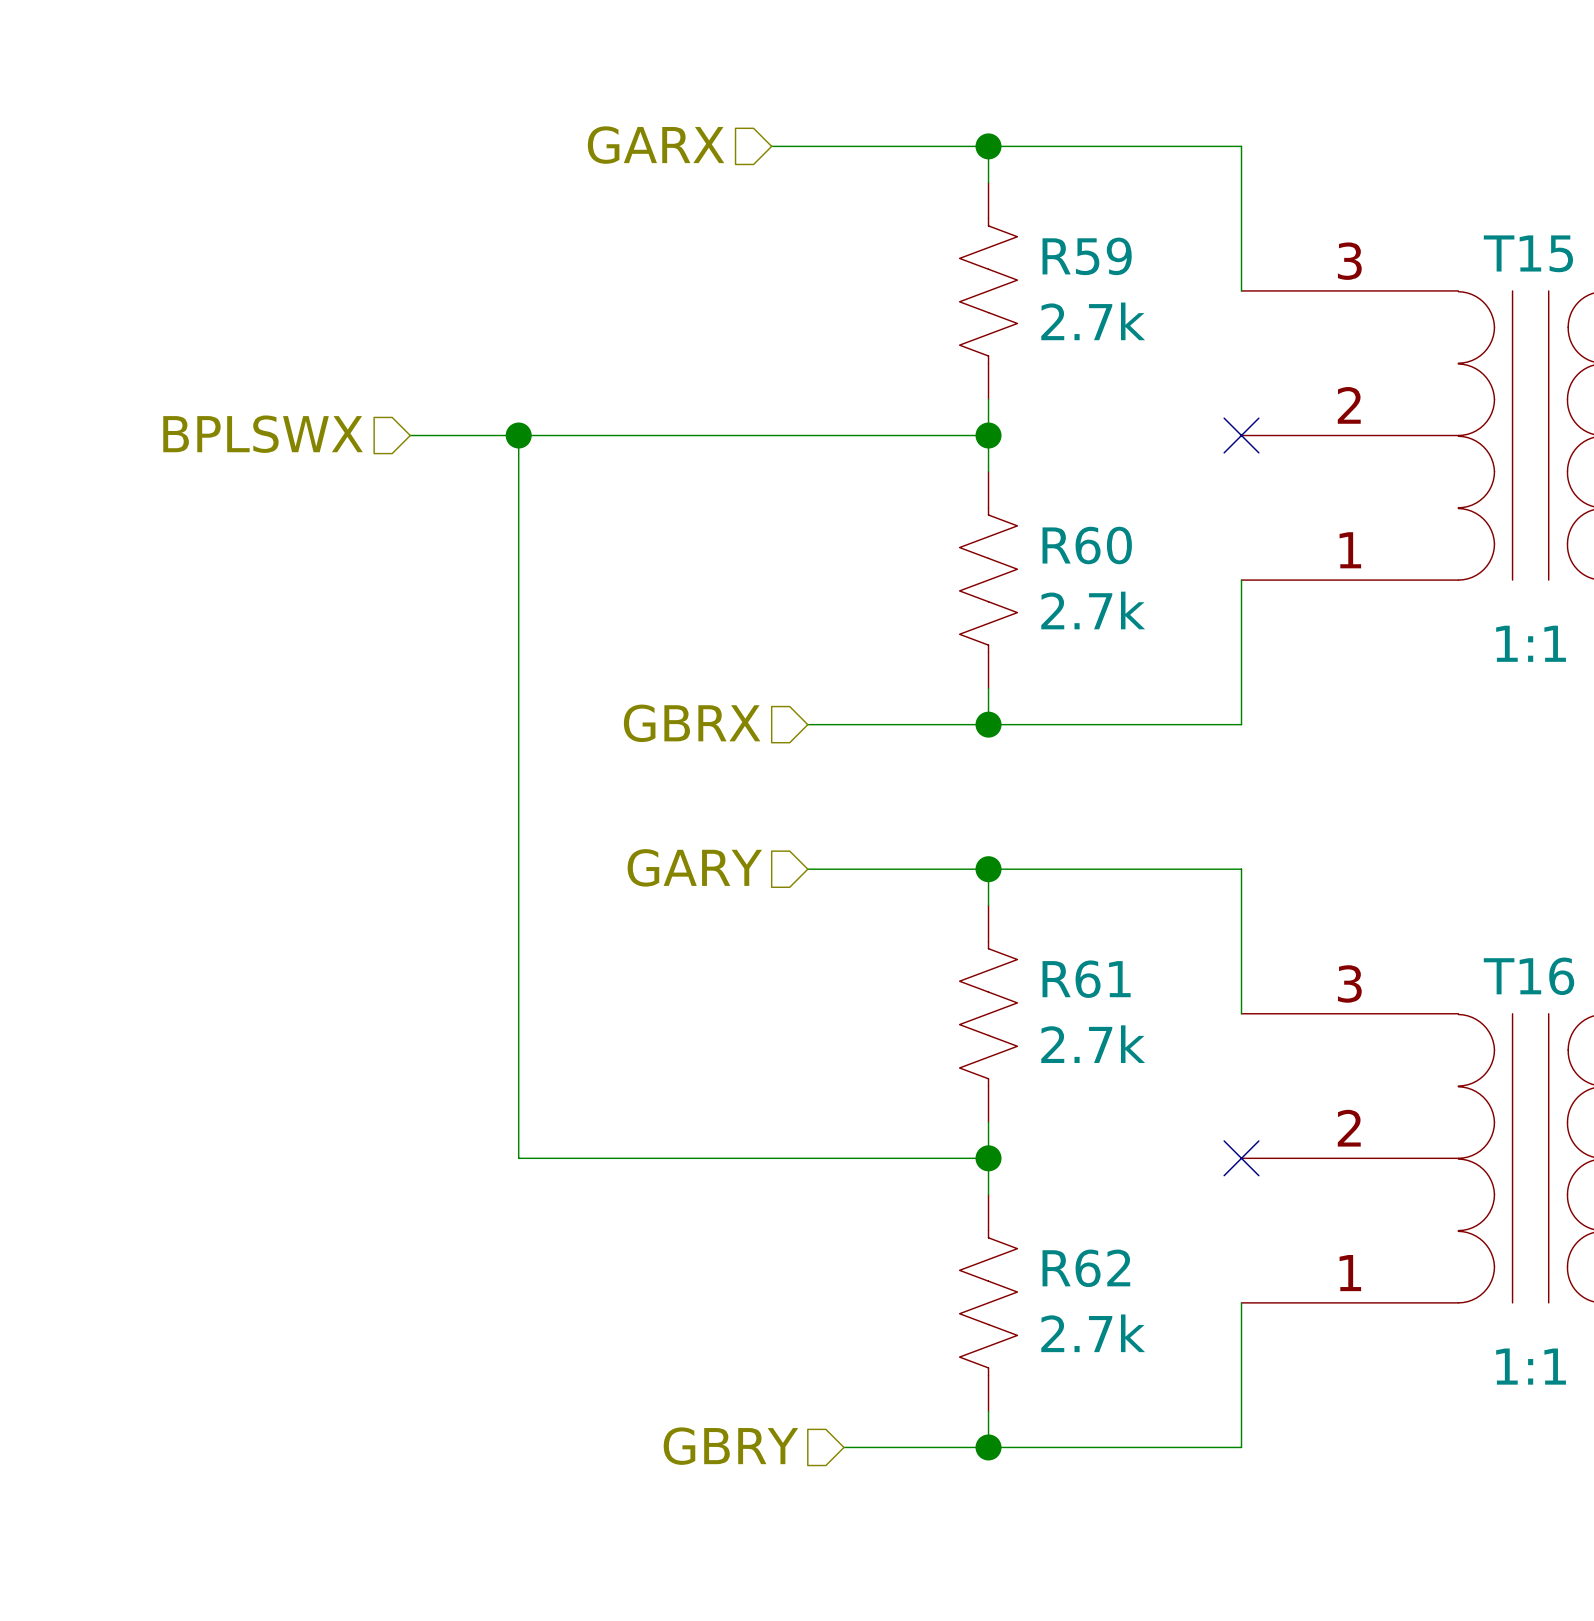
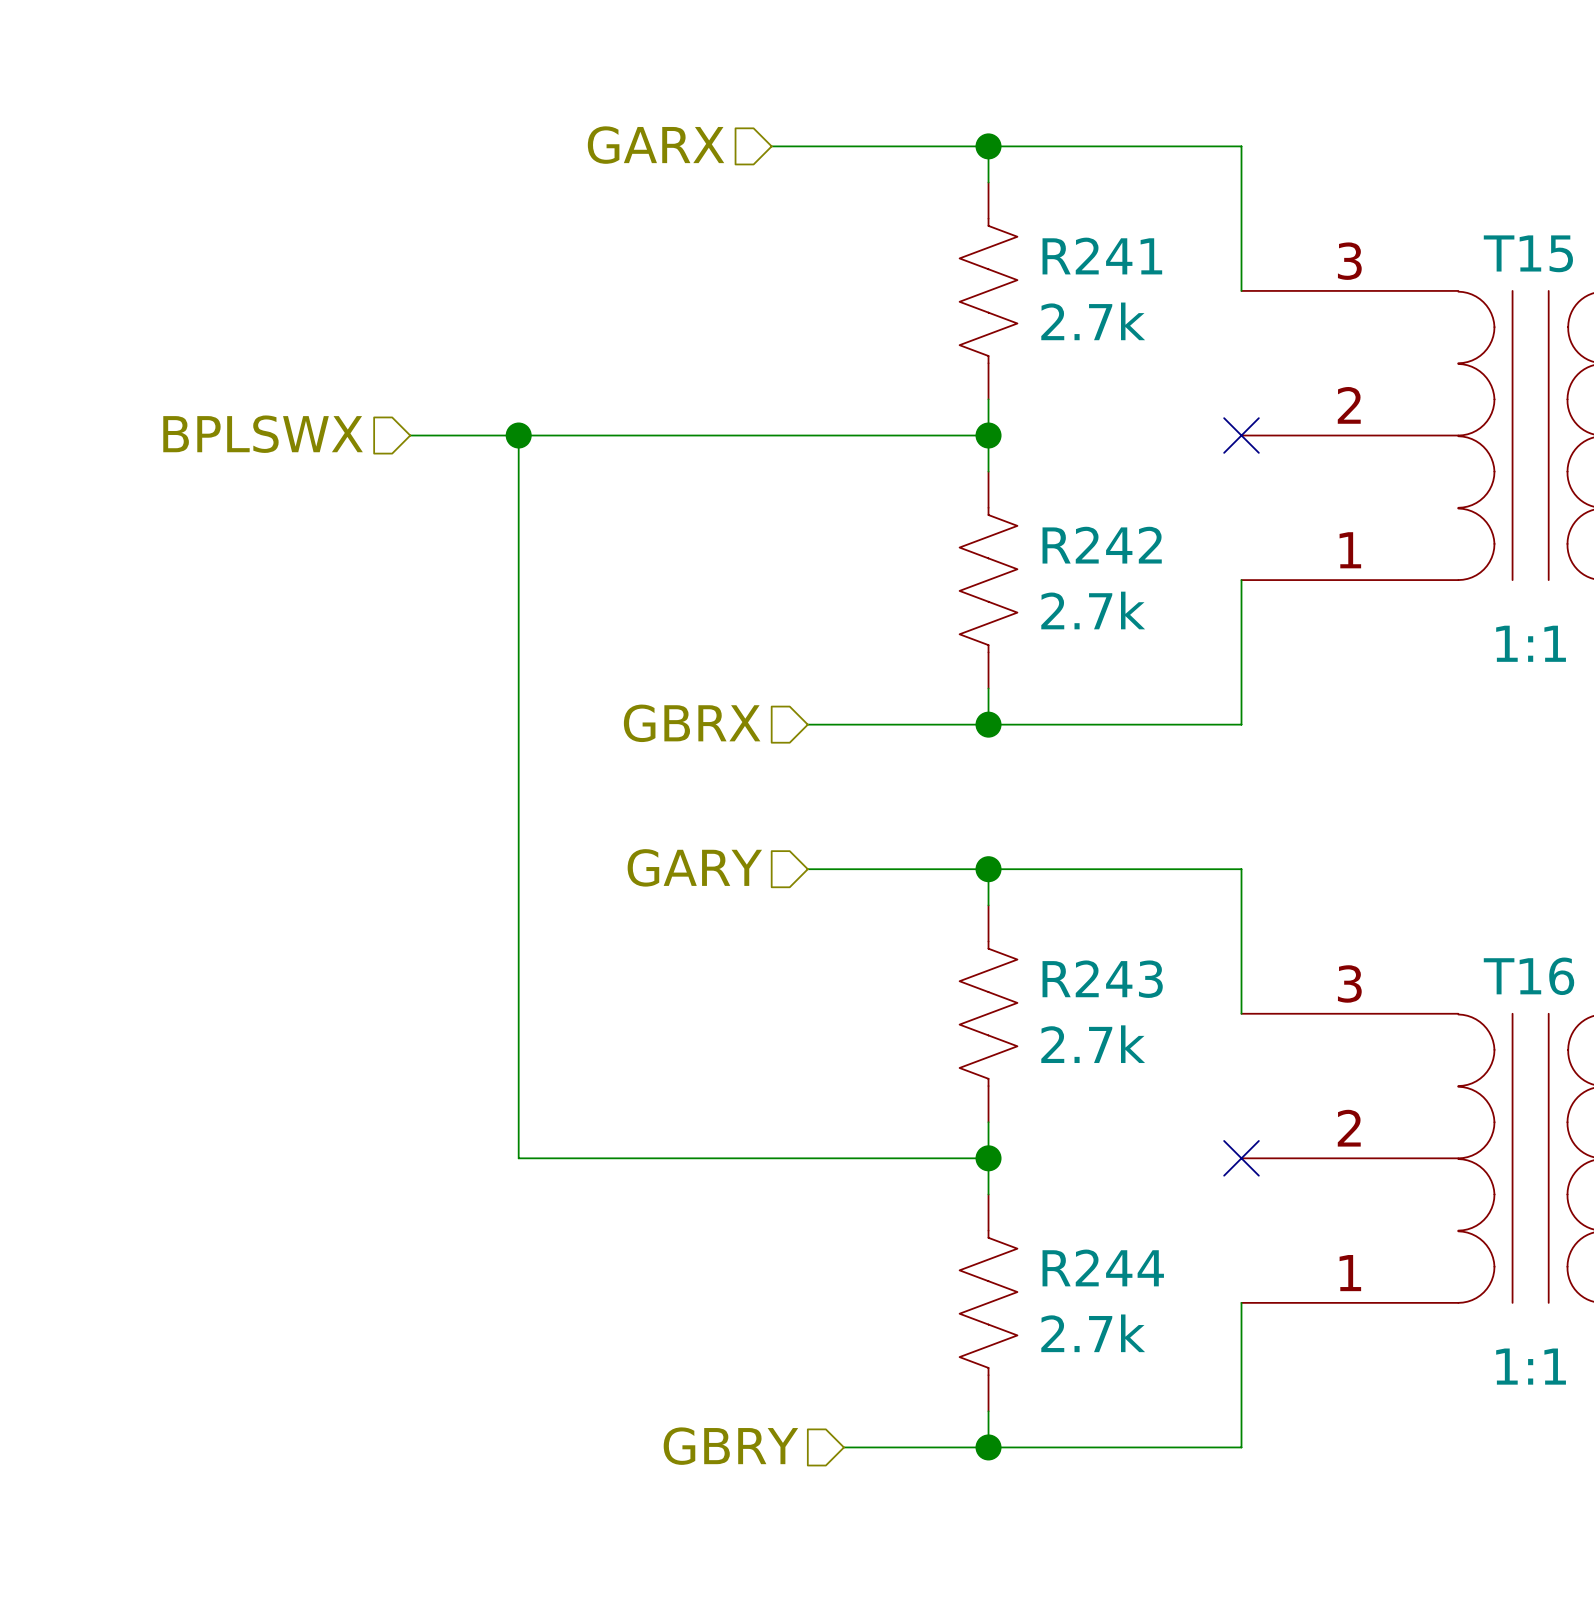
R59 name: R59 (1087, 256) -> R241 (1102, 256)
R60 name: R60 (1087, 545) -> R242 (1102, 545)
R61 name: R61 (1086, 979) -> R243 (1102, 979)
R62 name: R62 (1086, 1268) -> R244 (1103, 1267)

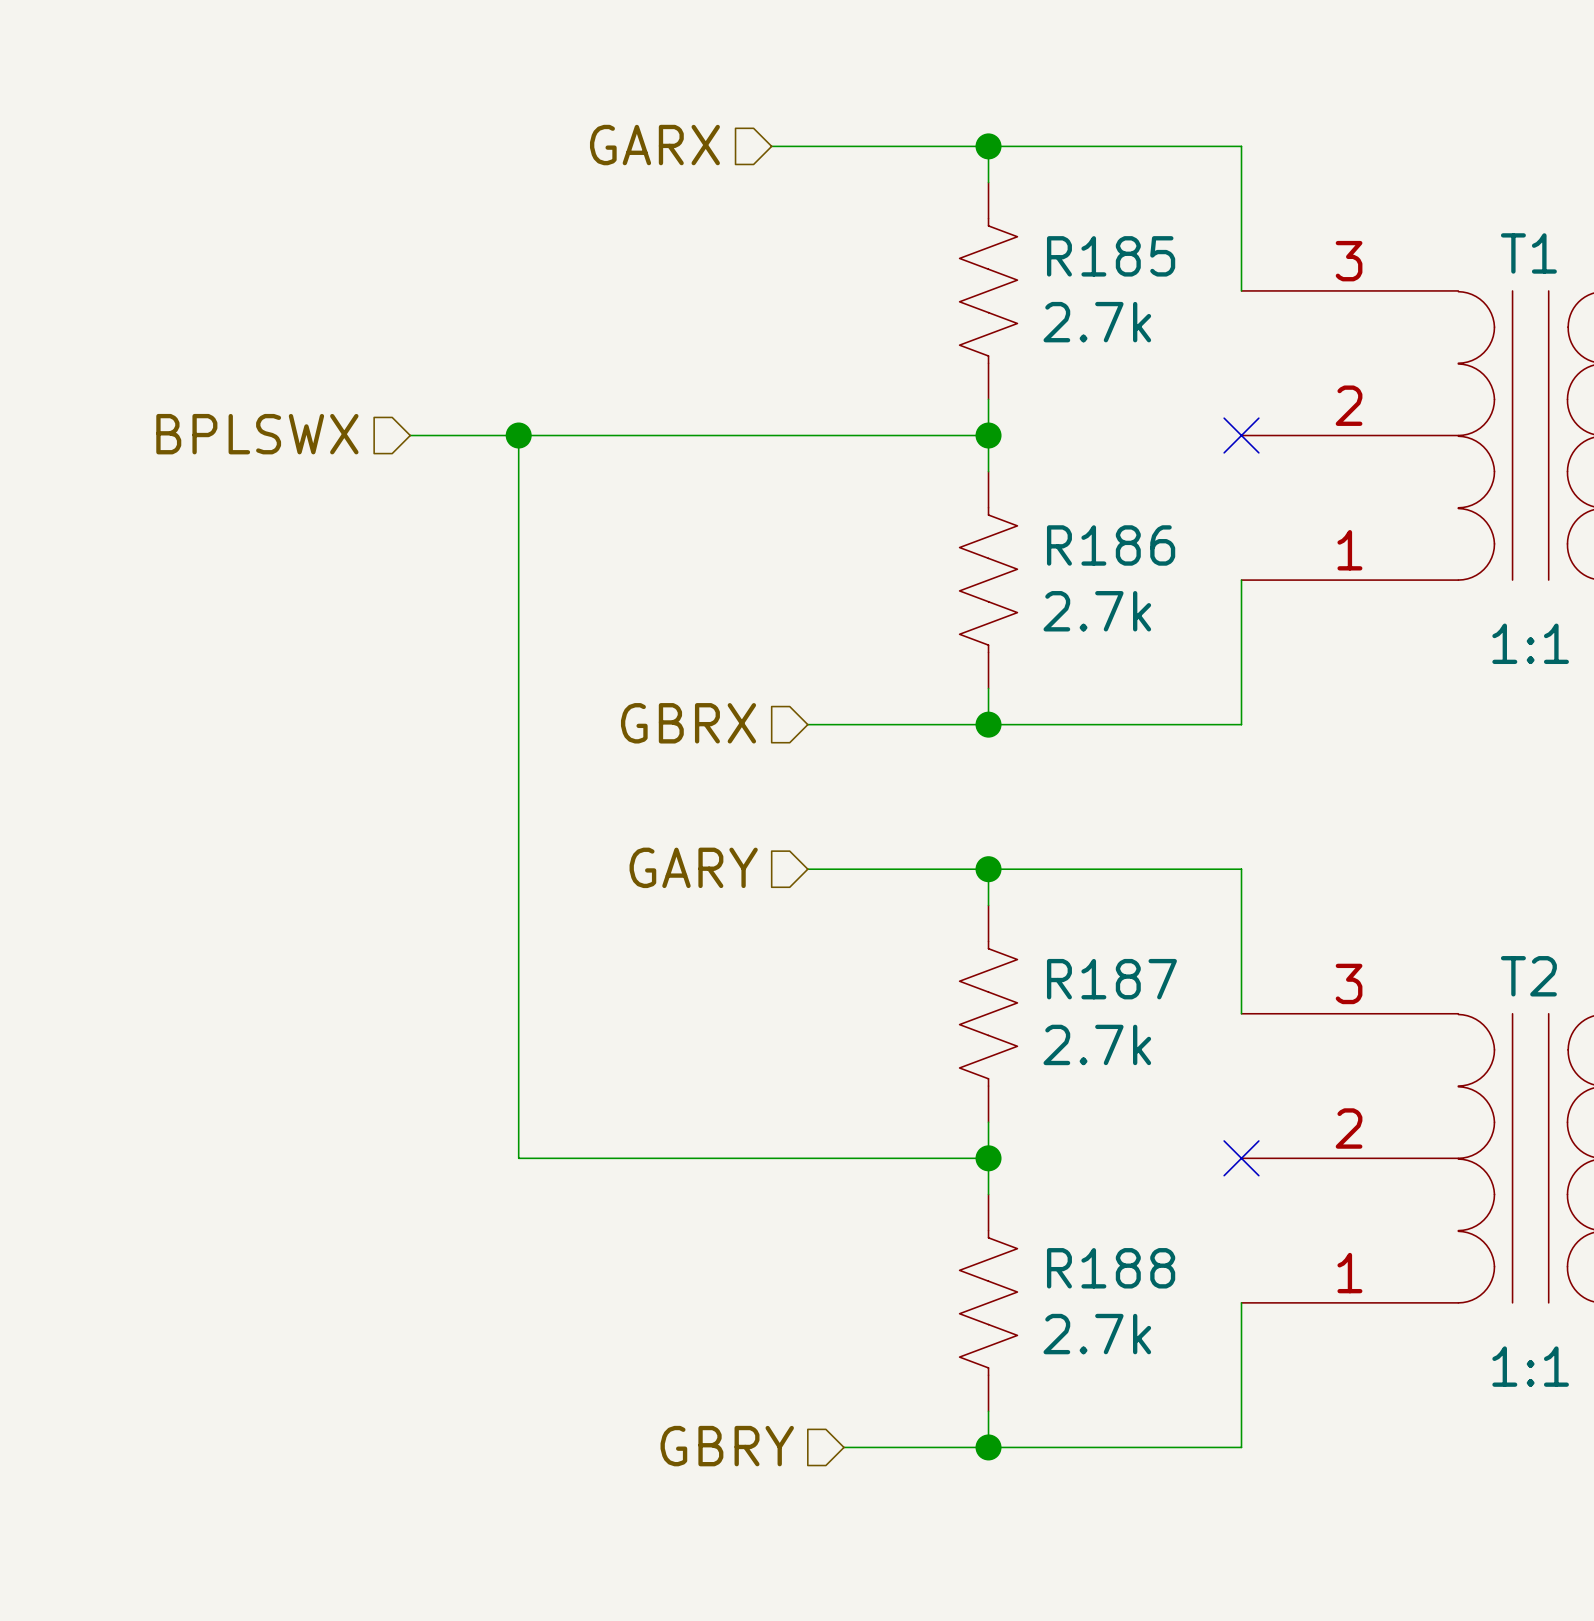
T15 name: T15 (1528, 253) -> T1 (1528, 253)
R241 name: R241 (1102, 256) -> R185 (1111, 256)
R242 name: R242 (1102, 545) -> R186 (1111, 545)
T16 name: T16 (1528, 976) -> T2 (1528, 976)
R243 name: R243 (1102, 979) -> R187 (1111, 979)
R244 name: R244 (1103, 1267) -> R188 (1111, 1268)

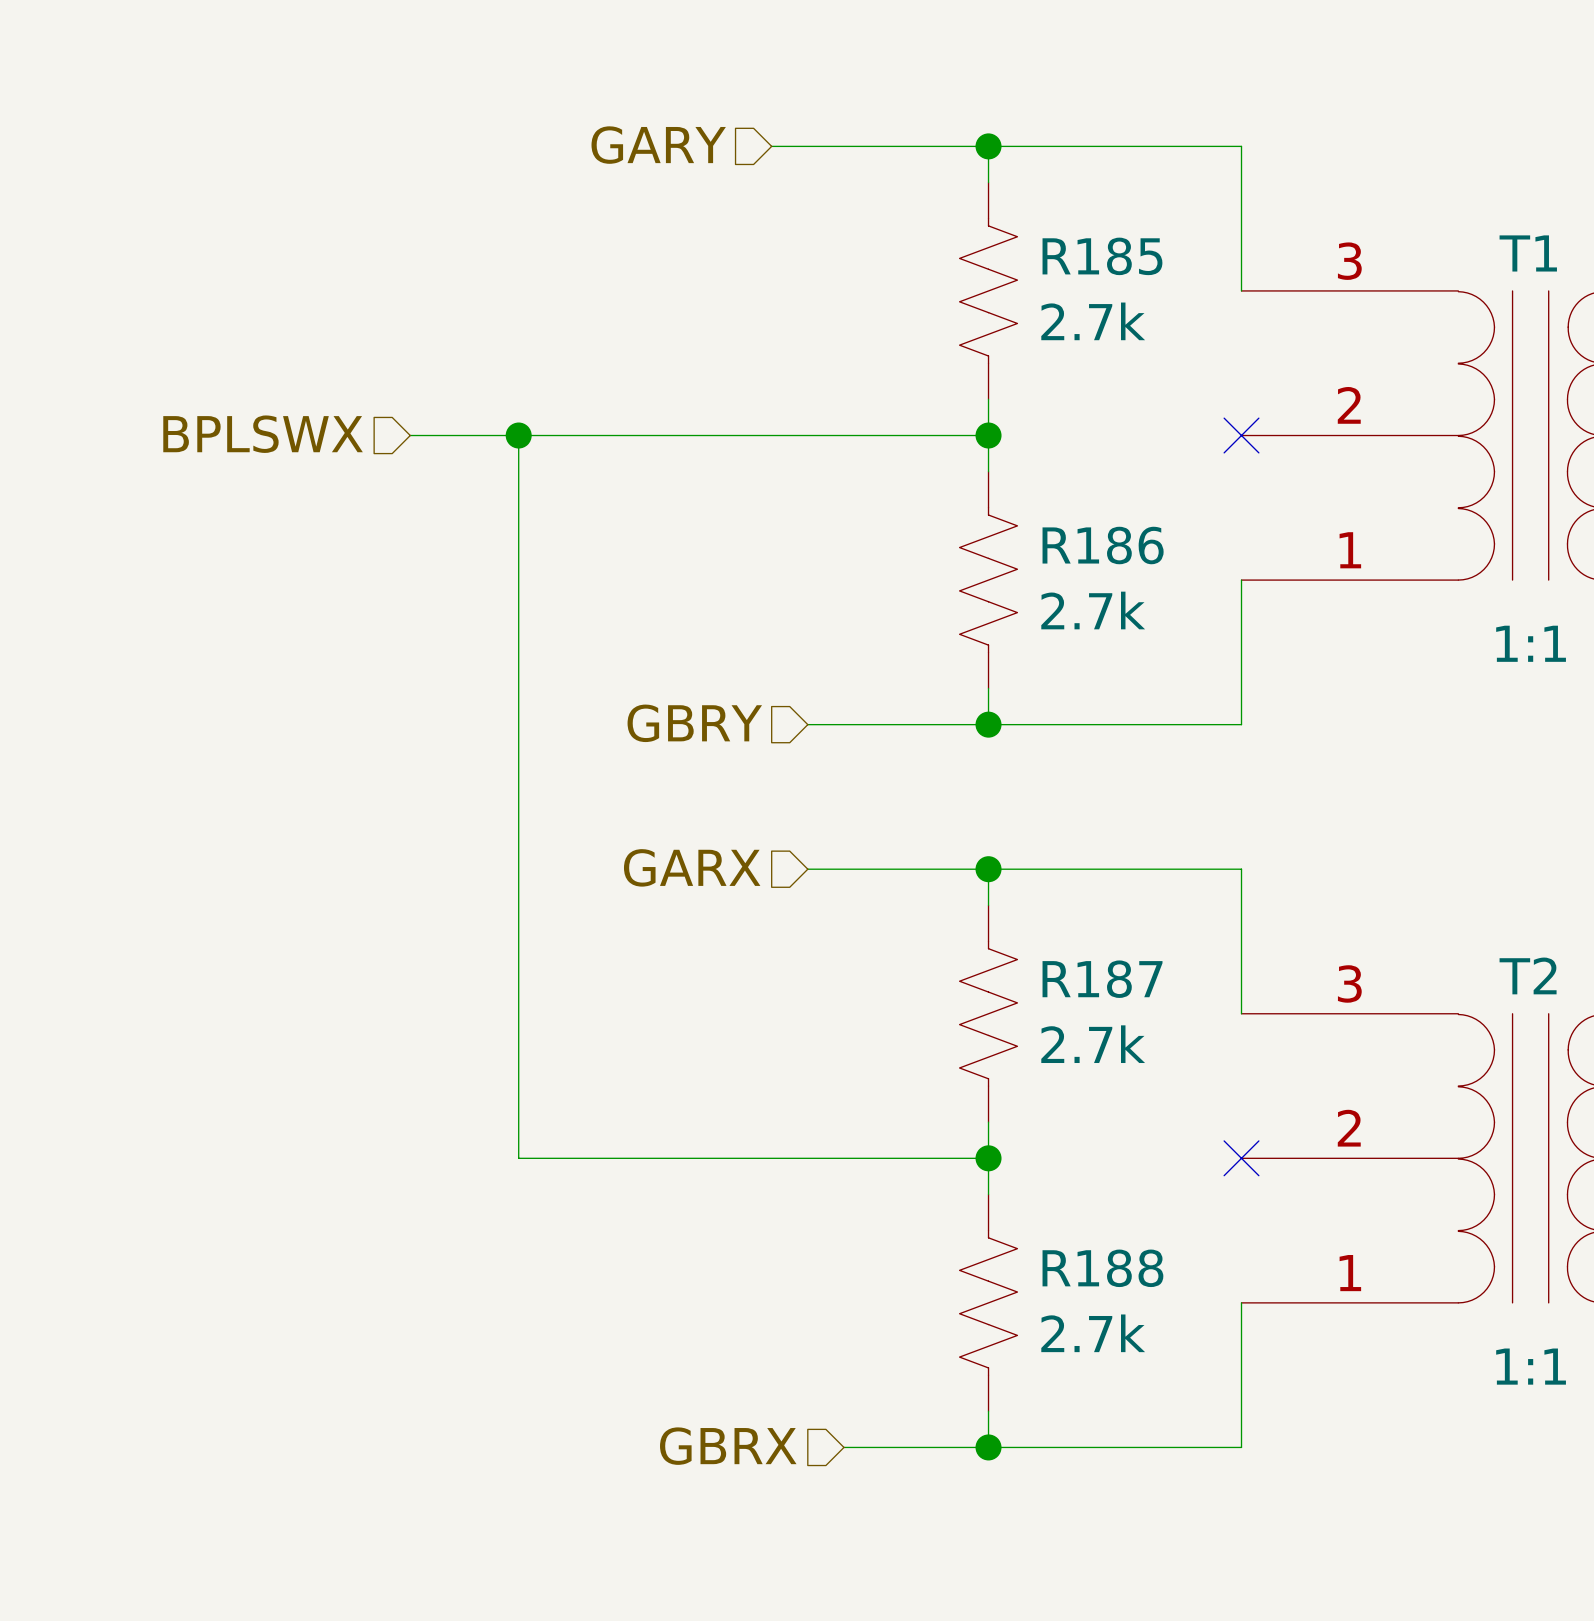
hierarchical label: GARX (654, 145) -> GARY (658, 145)
hierarchical label: GBRX (688, 723) -> GBRY (694, 723)
hierarchical label: GARY (693, 867) -> GARX (692, 867)
hierarchical label: GBRY (727, 1446) -> GBRX (728, 1446)

